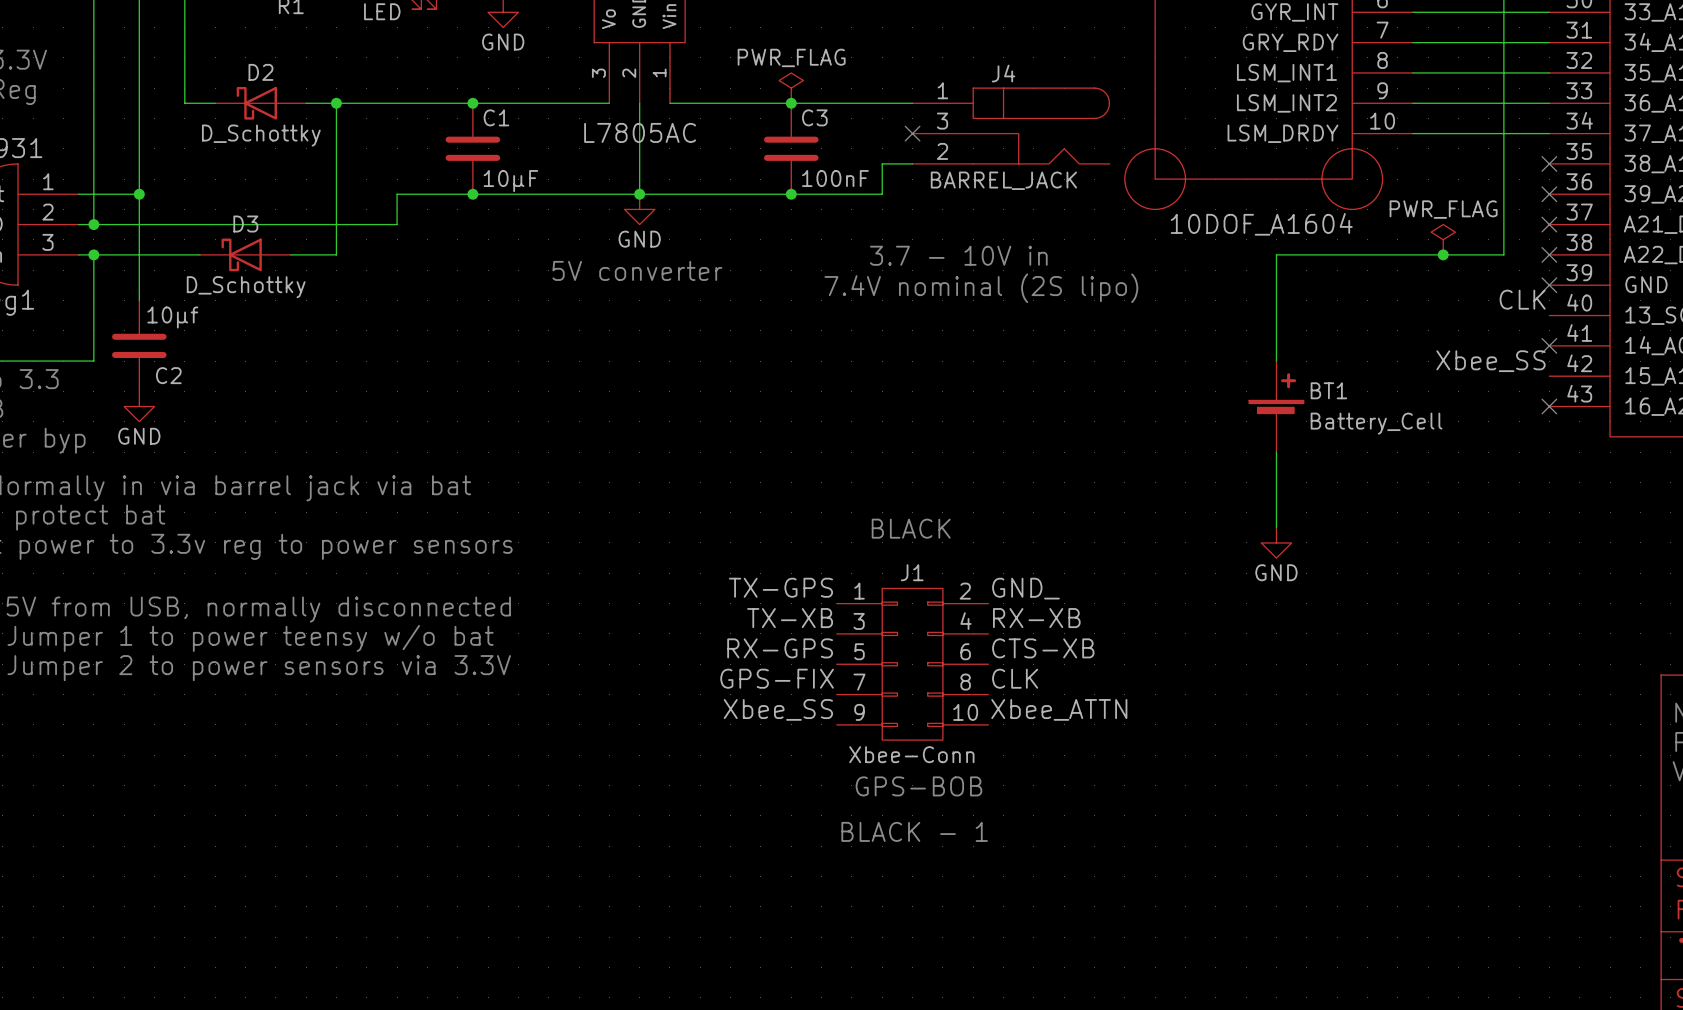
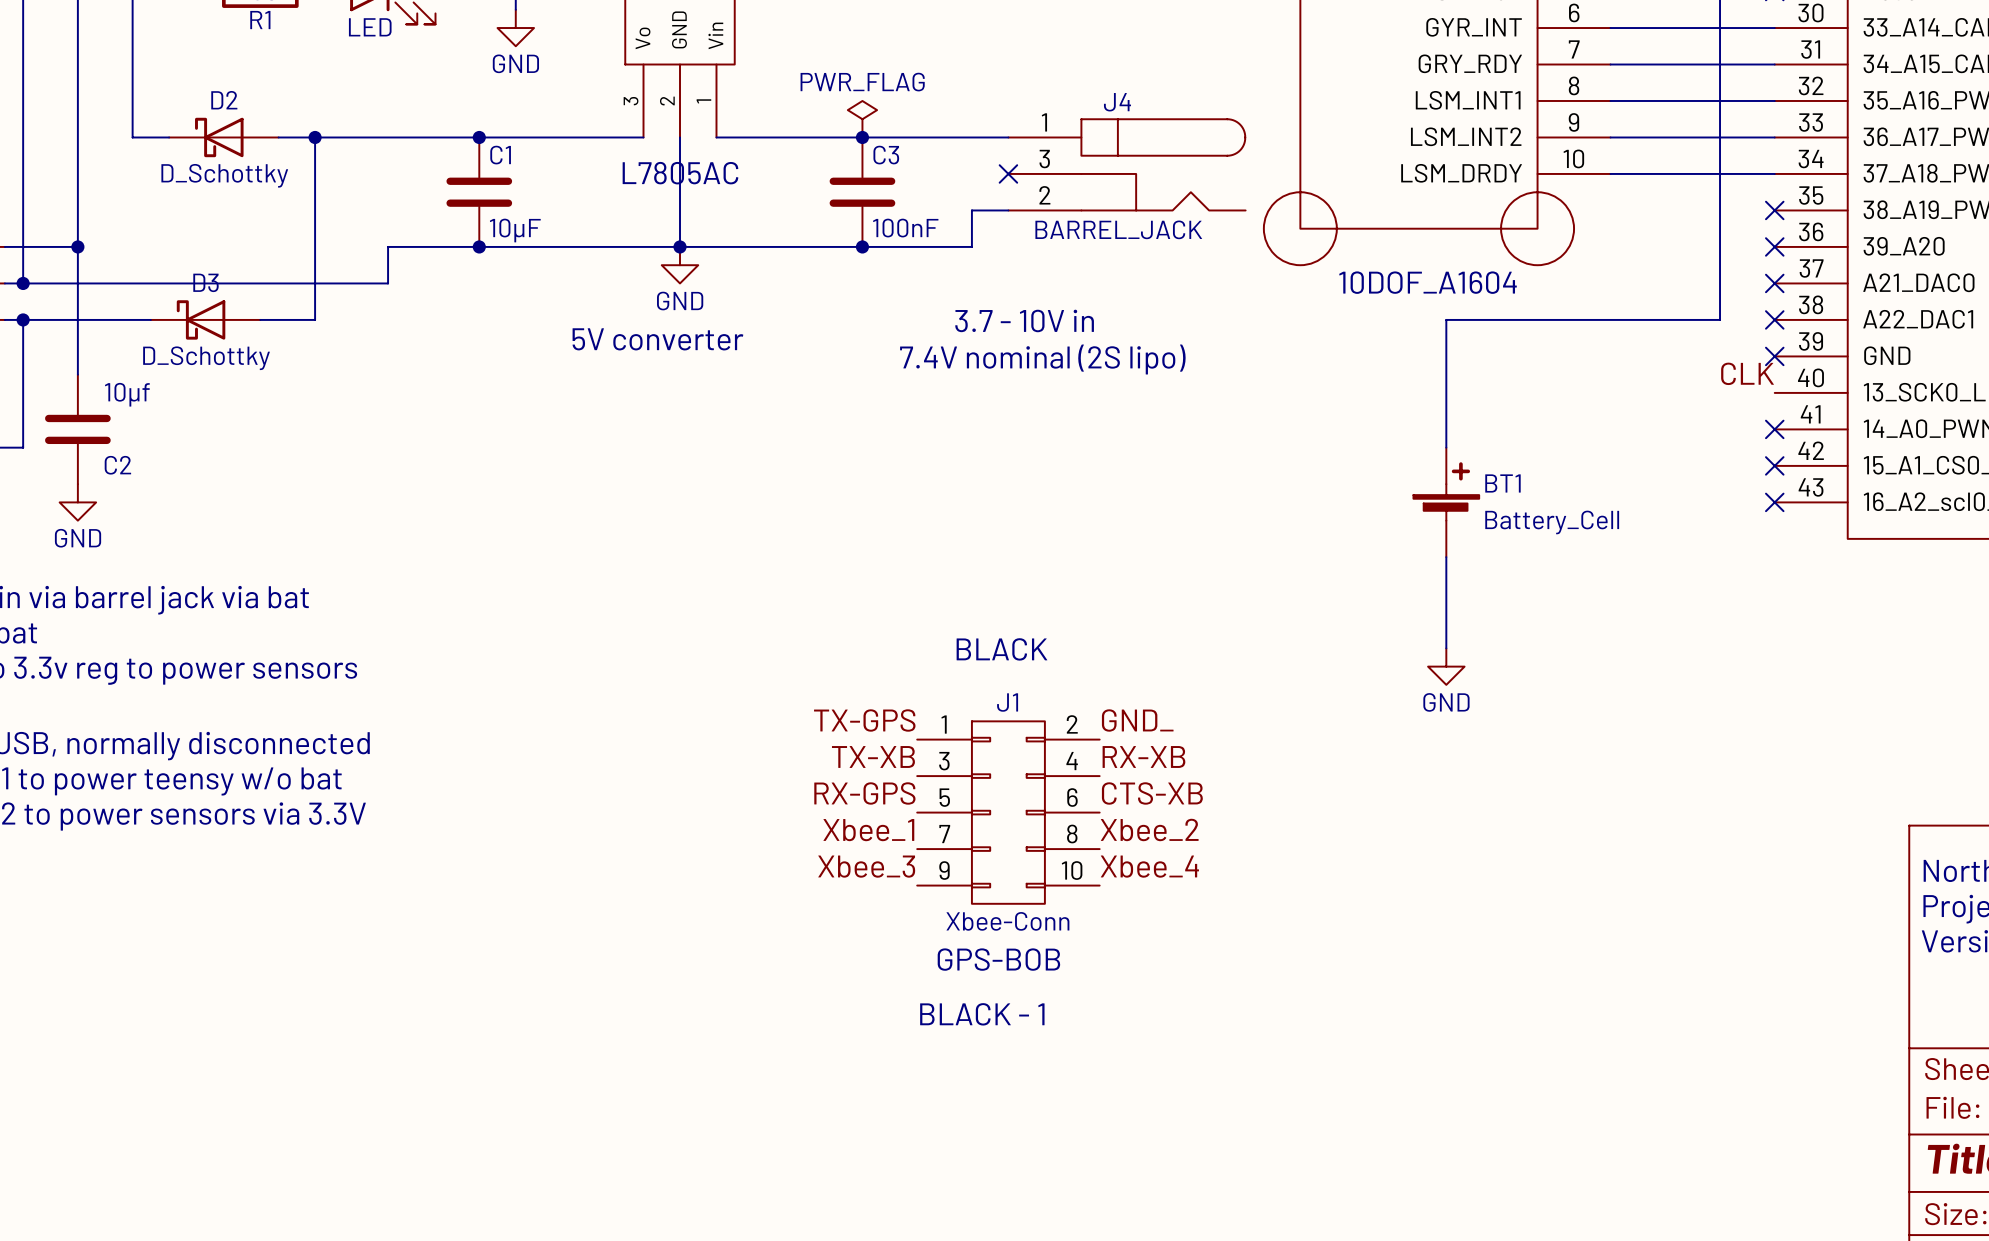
power symbol: PWR_FLAG (1443, 239) -> none
junction: (1443, 254) -> none
label: Xbee_SS (1490, 361) -> none
no-connect mark: none -> (1774, 465)
label: GPS-FIX (777, 678) -> Xbee_1 (868, 830)
label: CLK (1015, 678) -> Xbee_2 (1149, 829)
label: Xbee_SS (778, 709) -> Xbee_3 (866, 866)
label: Xbee_ATTN (1059, 709) -> Xbee_4 (1149, 866)

